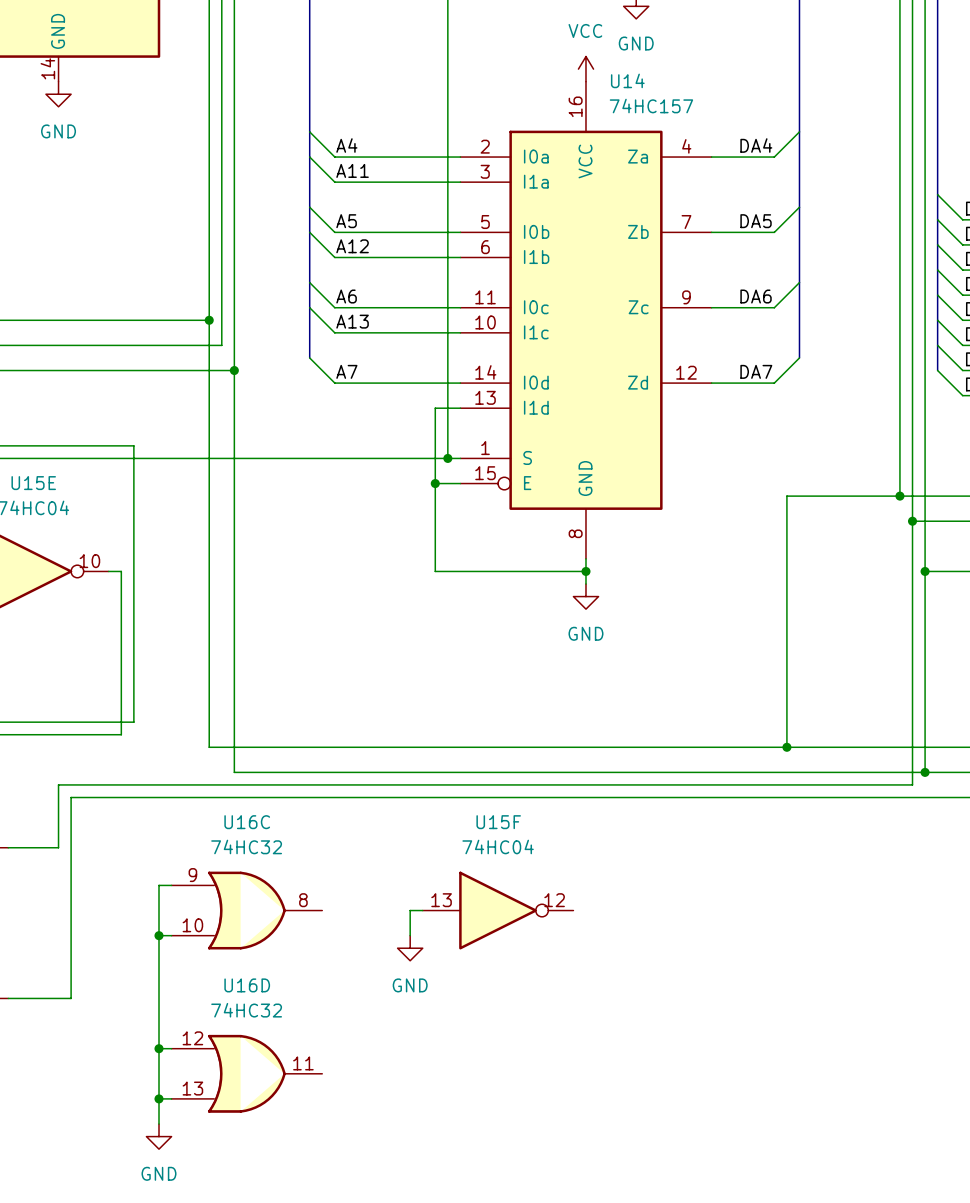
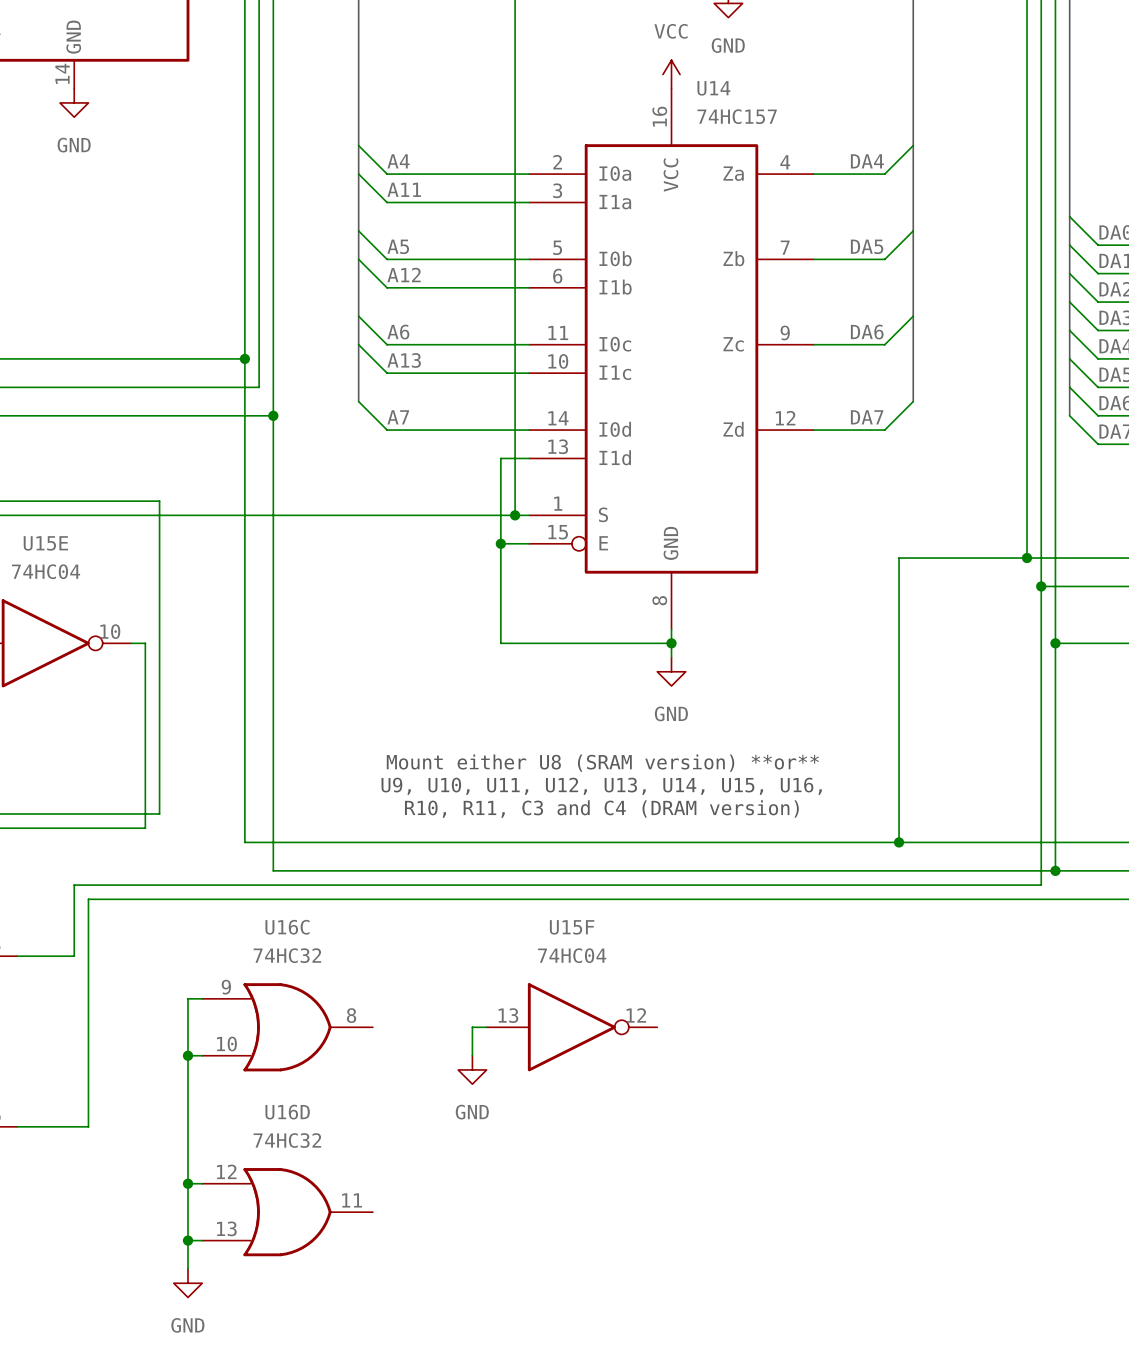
text: none -> Mount either U8 (SRAM version) **or** (602, 763)
text: none -> U9, U10, U11, U12, U13, U14, U15, U16, (601, 786)
text: none -> R10, R11, C3 and C4 (DRAM version) (601, 809)

